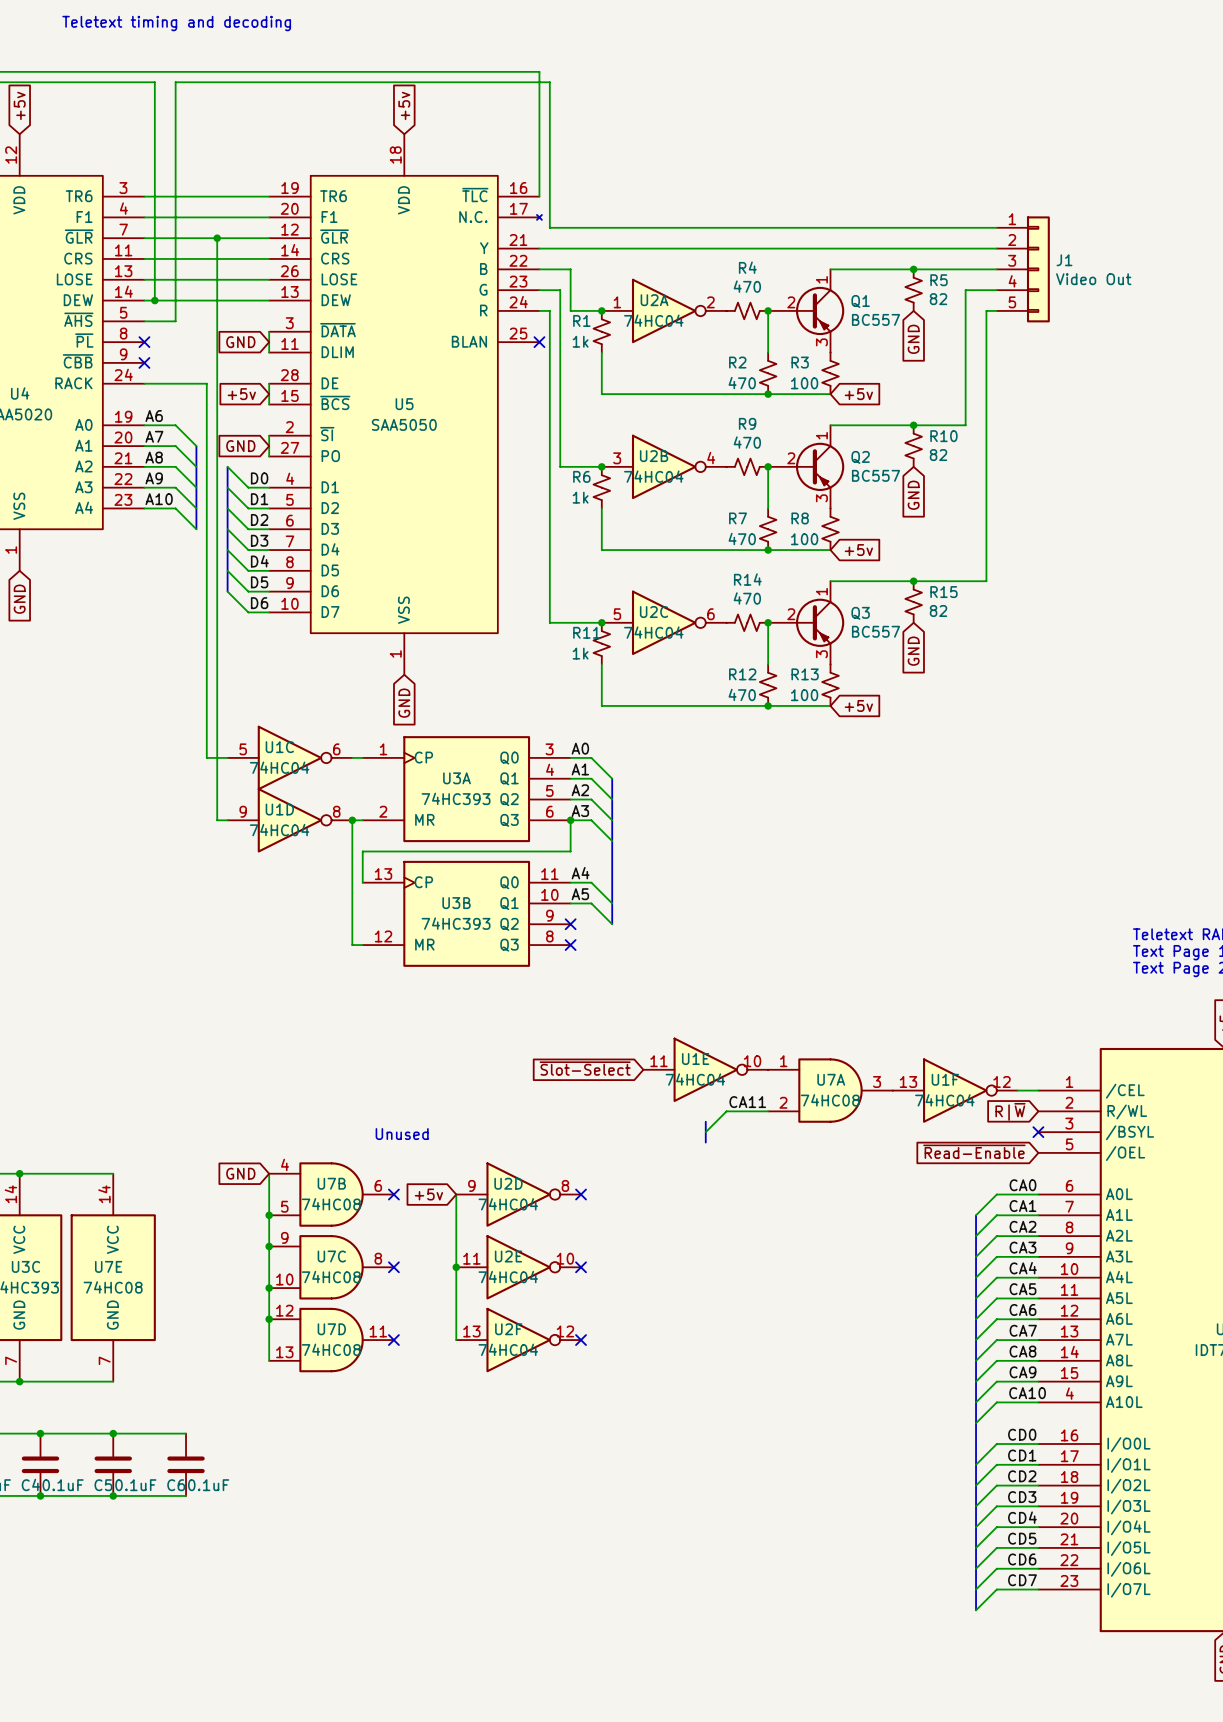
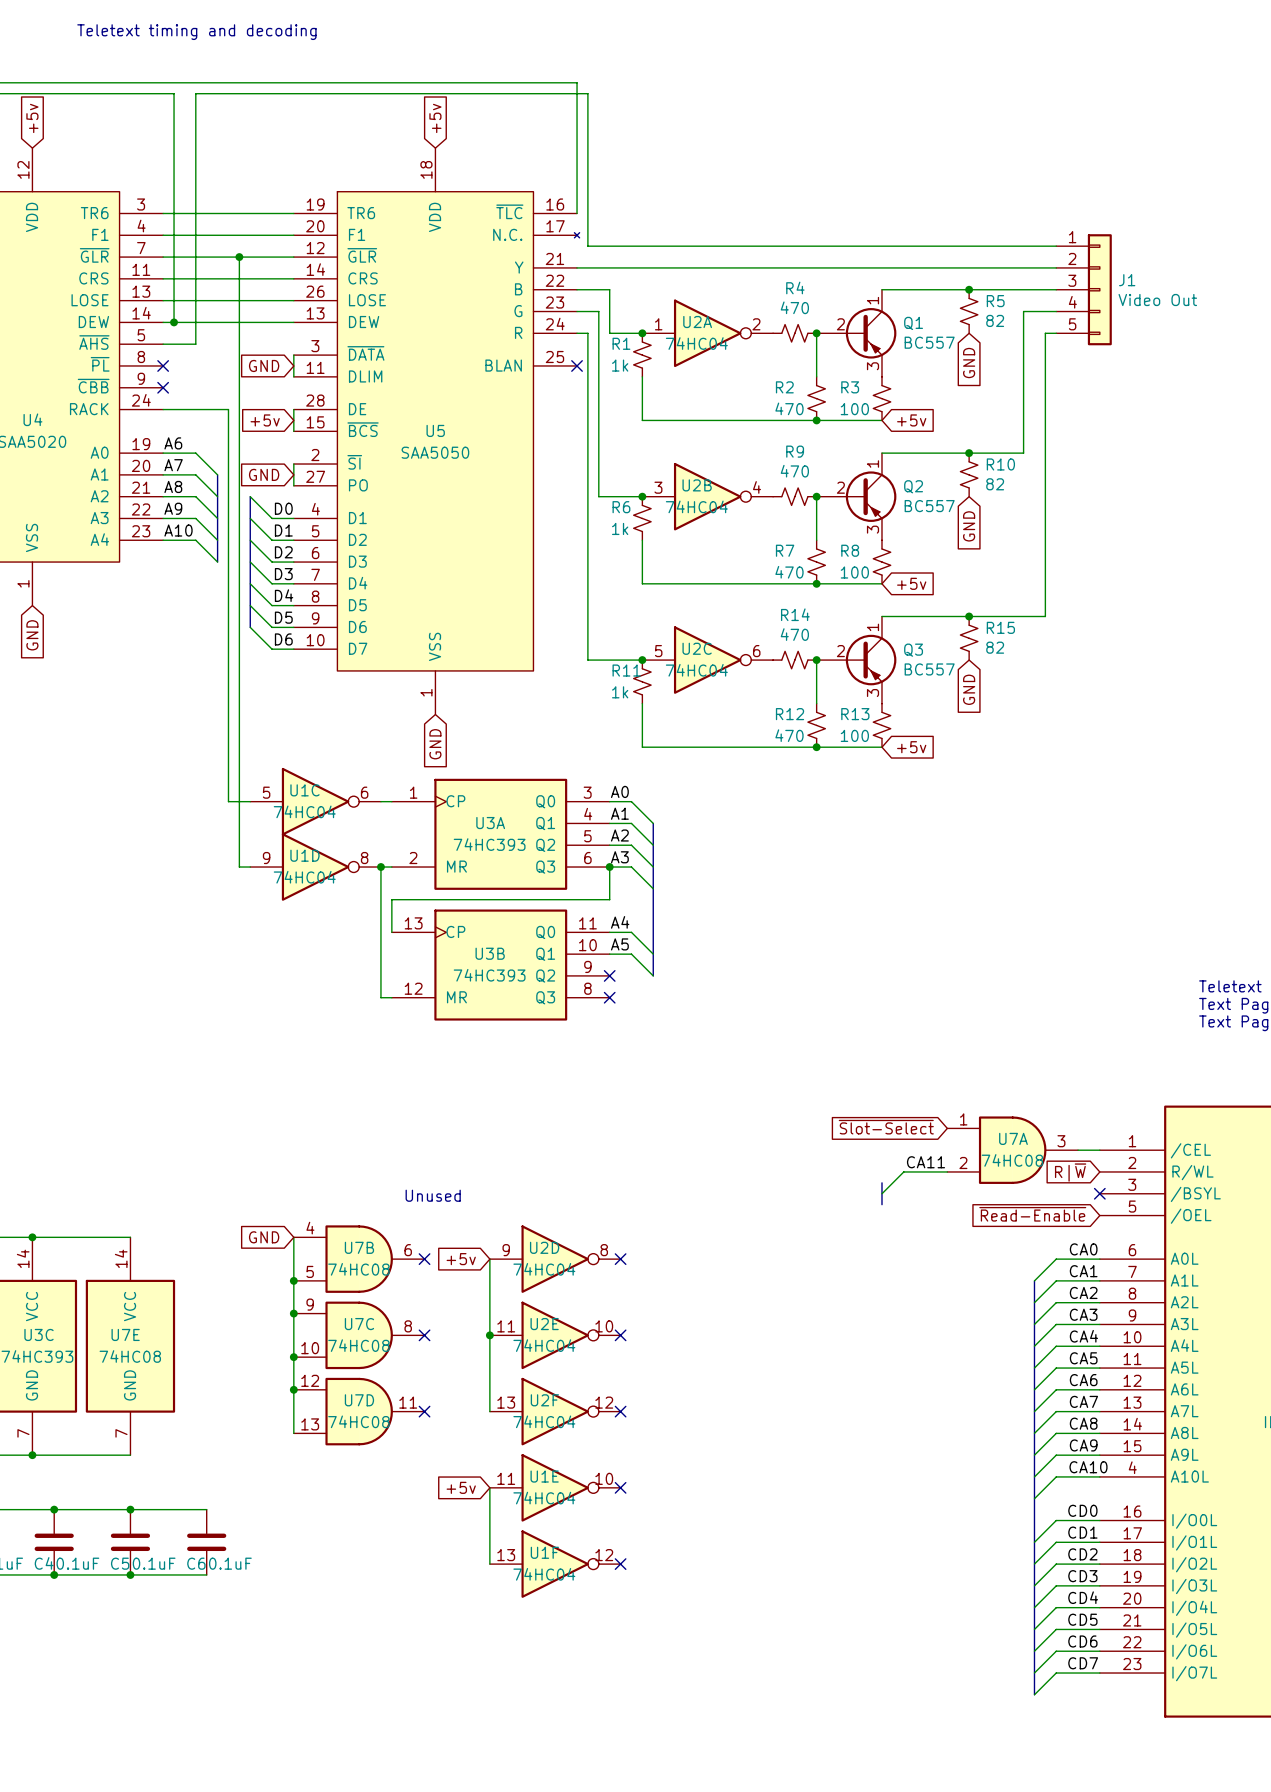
global label: ~{Slot-Select} (585, 1068) -> none
global label: none -> ~{Slot-Select} (886, 1127)
U1E position: (705, 1069) -> (555, 1487)
U7A position: (830, 1090) -> (1012, 1150)
U1F position: (955, 1090) -> (555, 1564)
label position: CA11 (747, 1102) -> CA11 (926, 1162)
wire: (768, 1111) (726, 1111) (705, 1132) -> (947, 1171) (903, 1171) (881, 1193)
bus: (705, 1121) (705, 1142) -> (881, 1182) (881, 1204)
global label: none -> +5v (461, 1487)
wire: none -> (489, 1487) (489, 1564)
no-connect mark: none -> (620, 1487)
no-connect mark: none -> (620, 1564)

